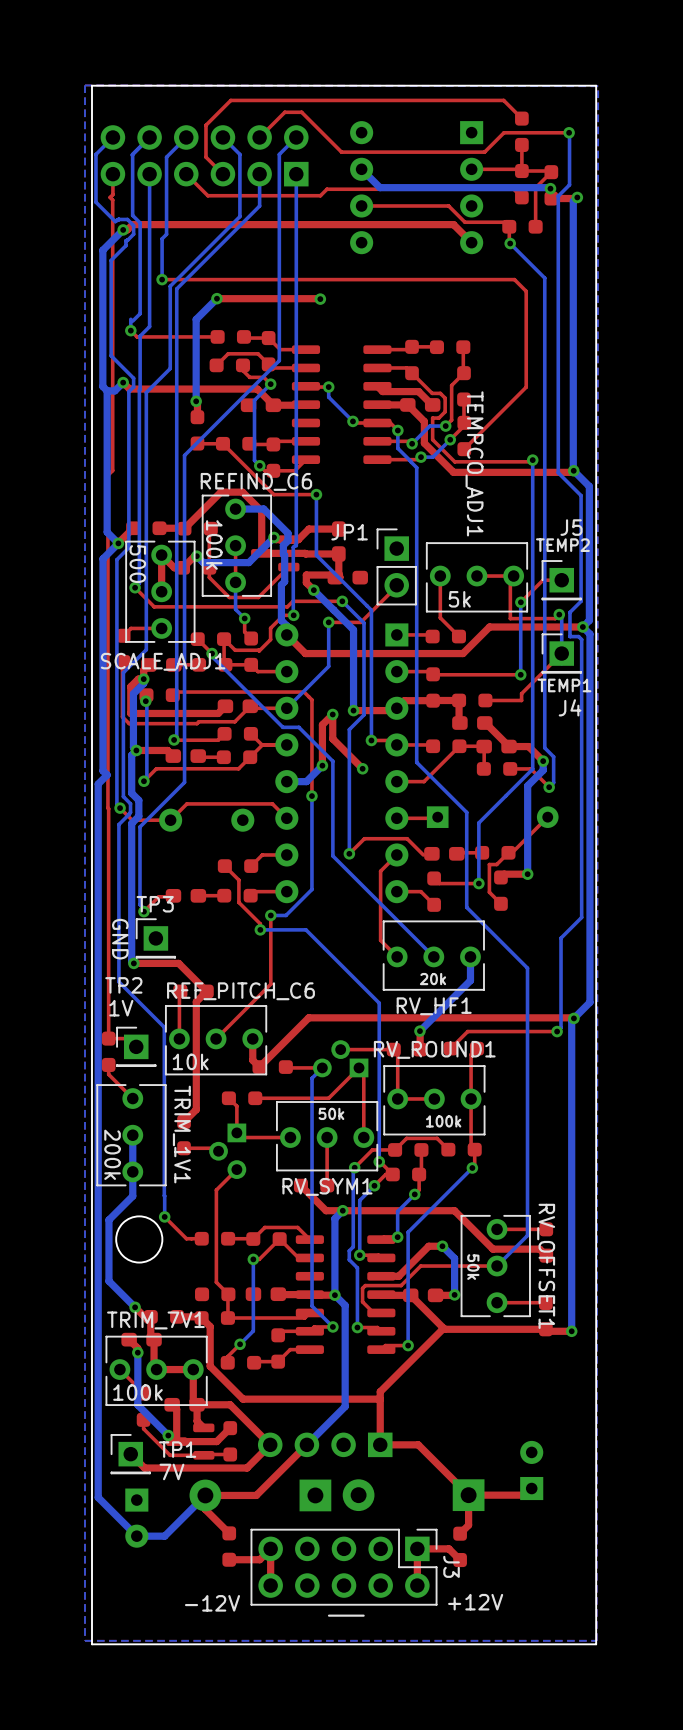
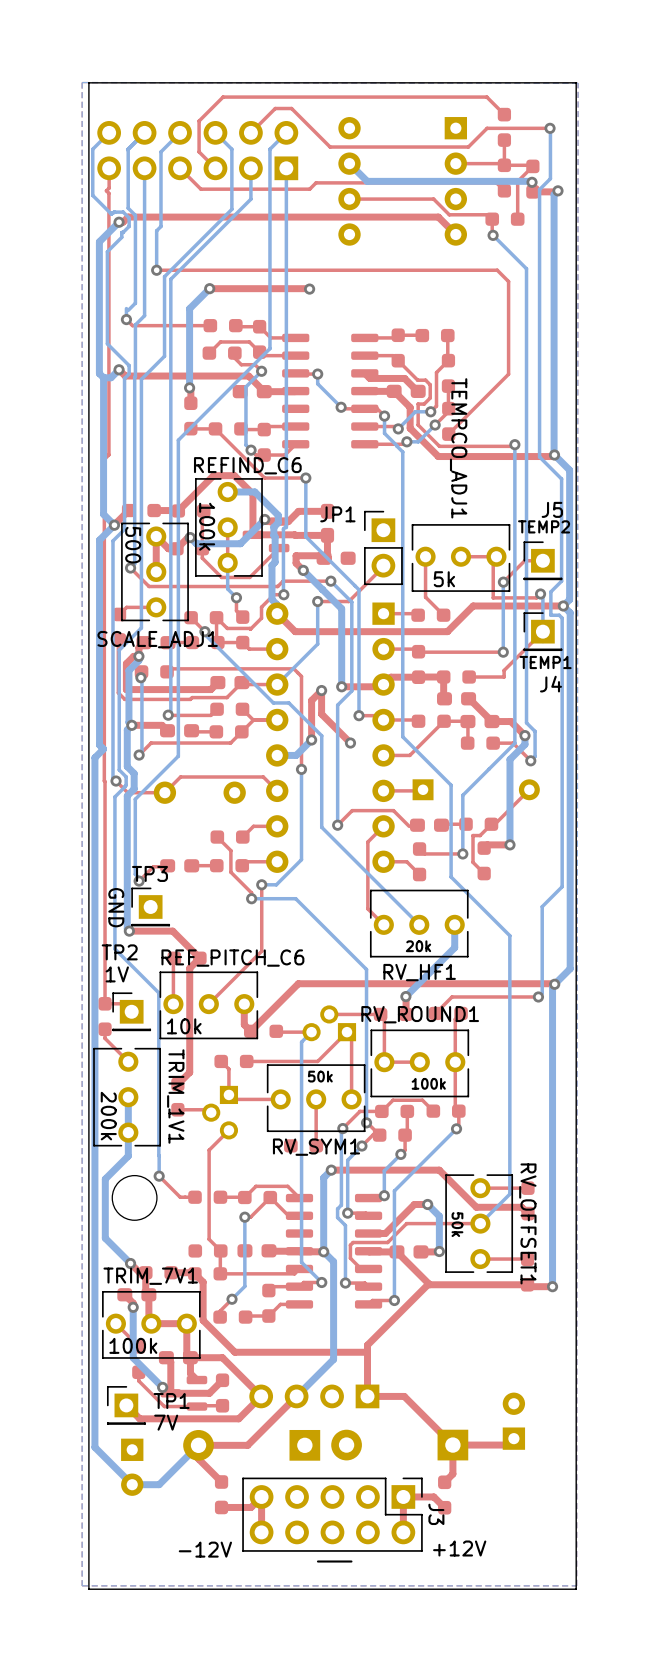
top track: (300, 1185) (326, 1210) (342, 1210) -> none

